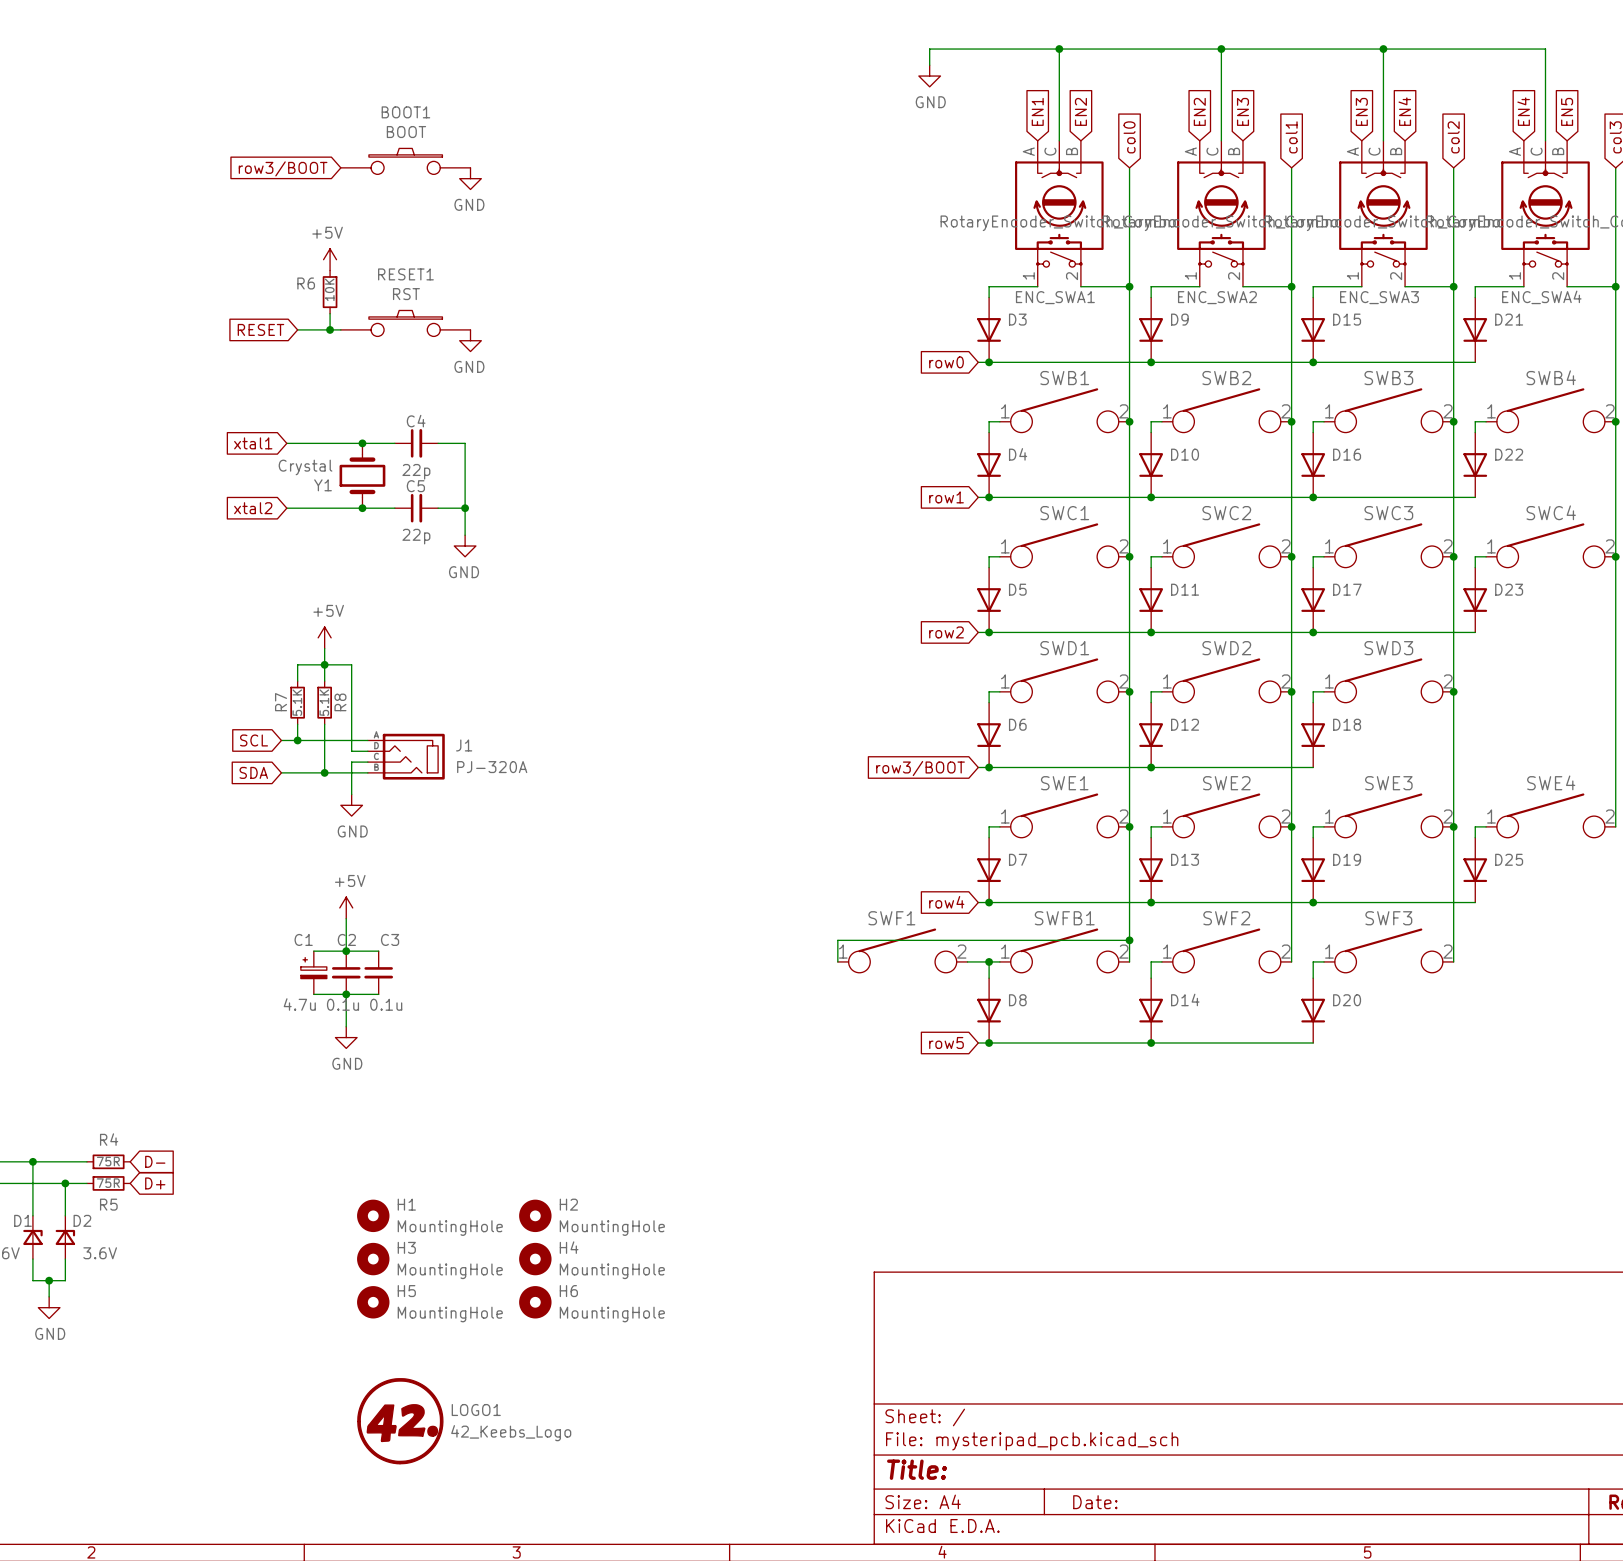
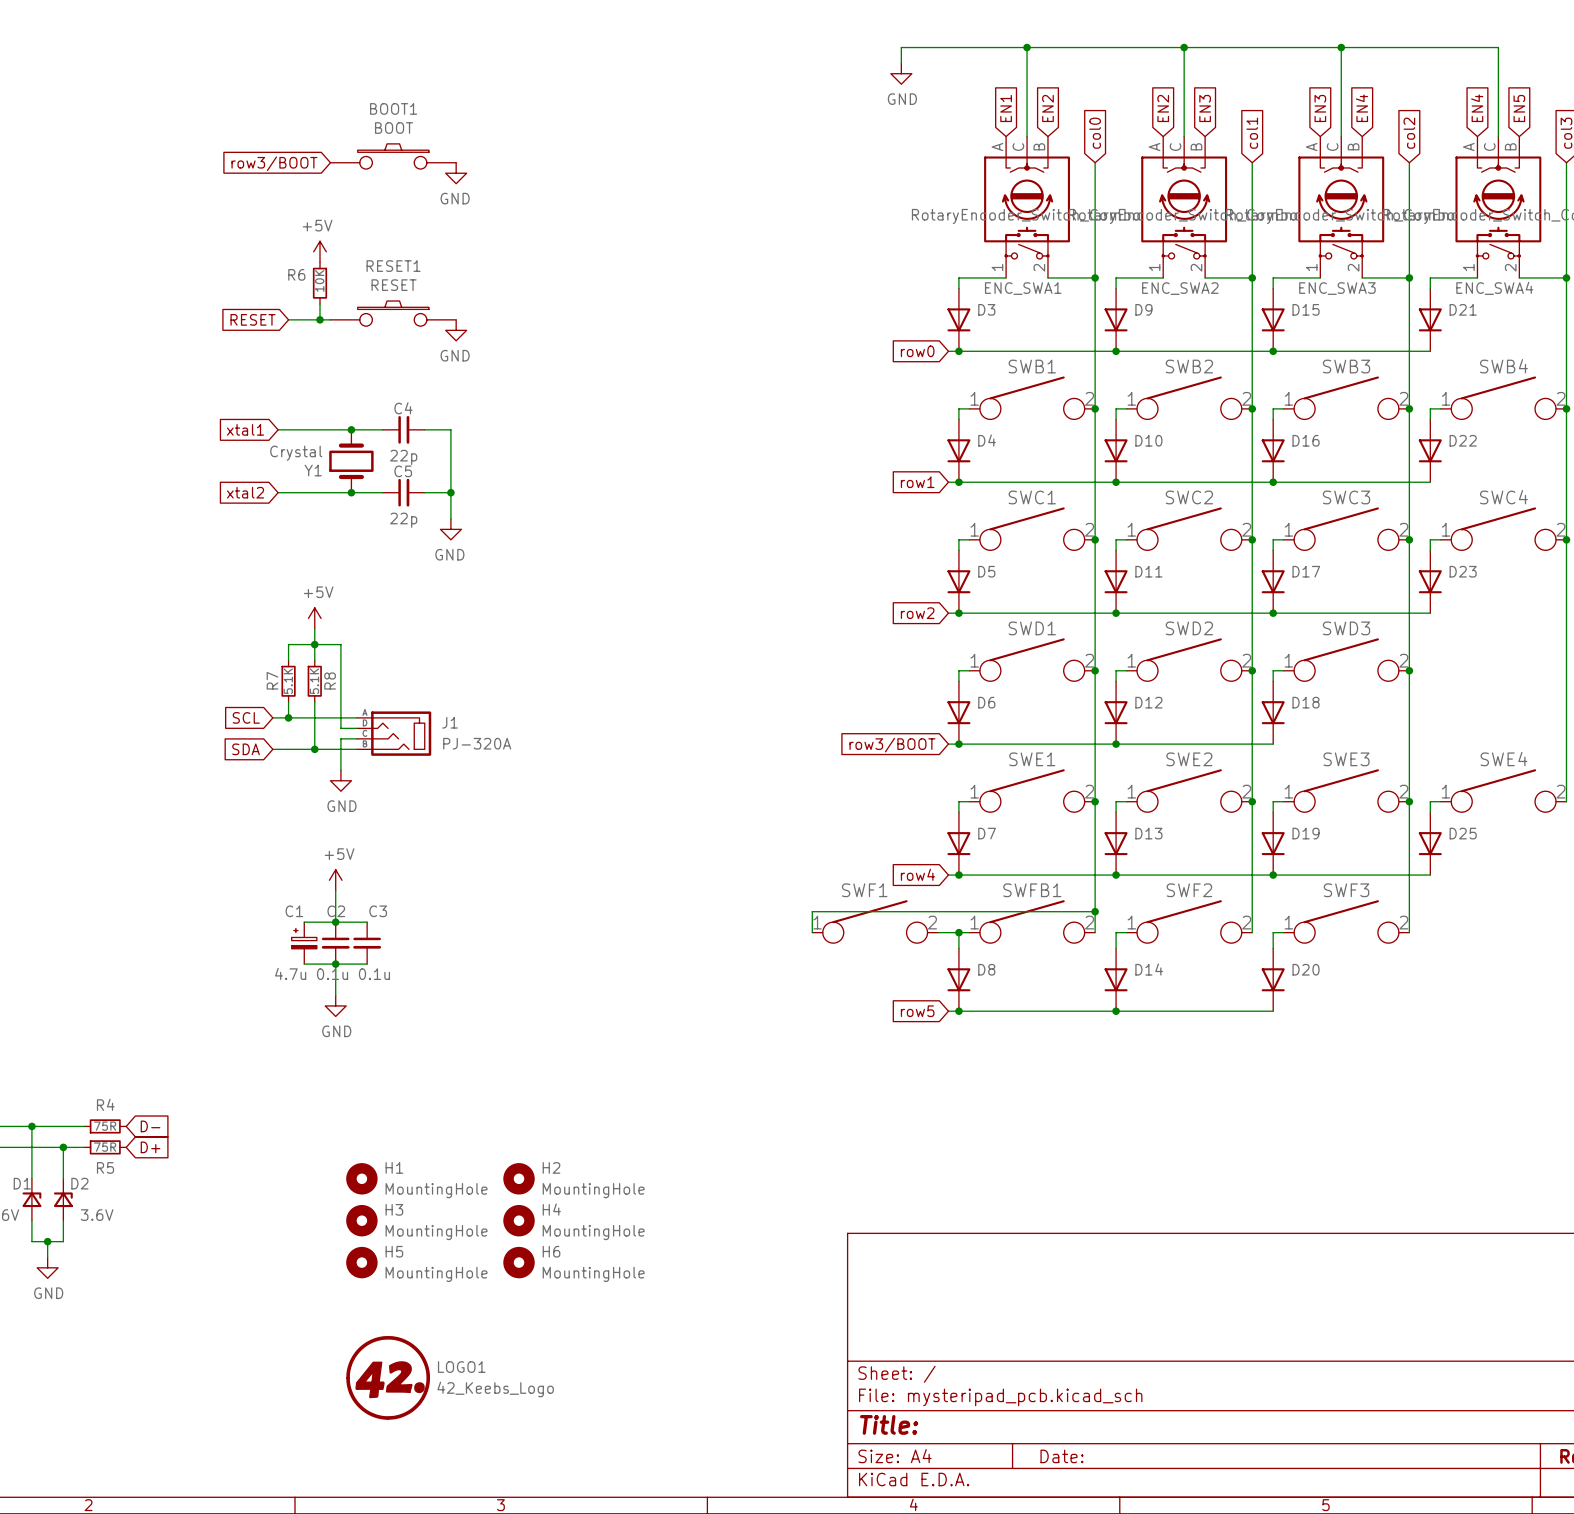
RESET1 value: RST (406, 294) -> RESET (394, 285)

